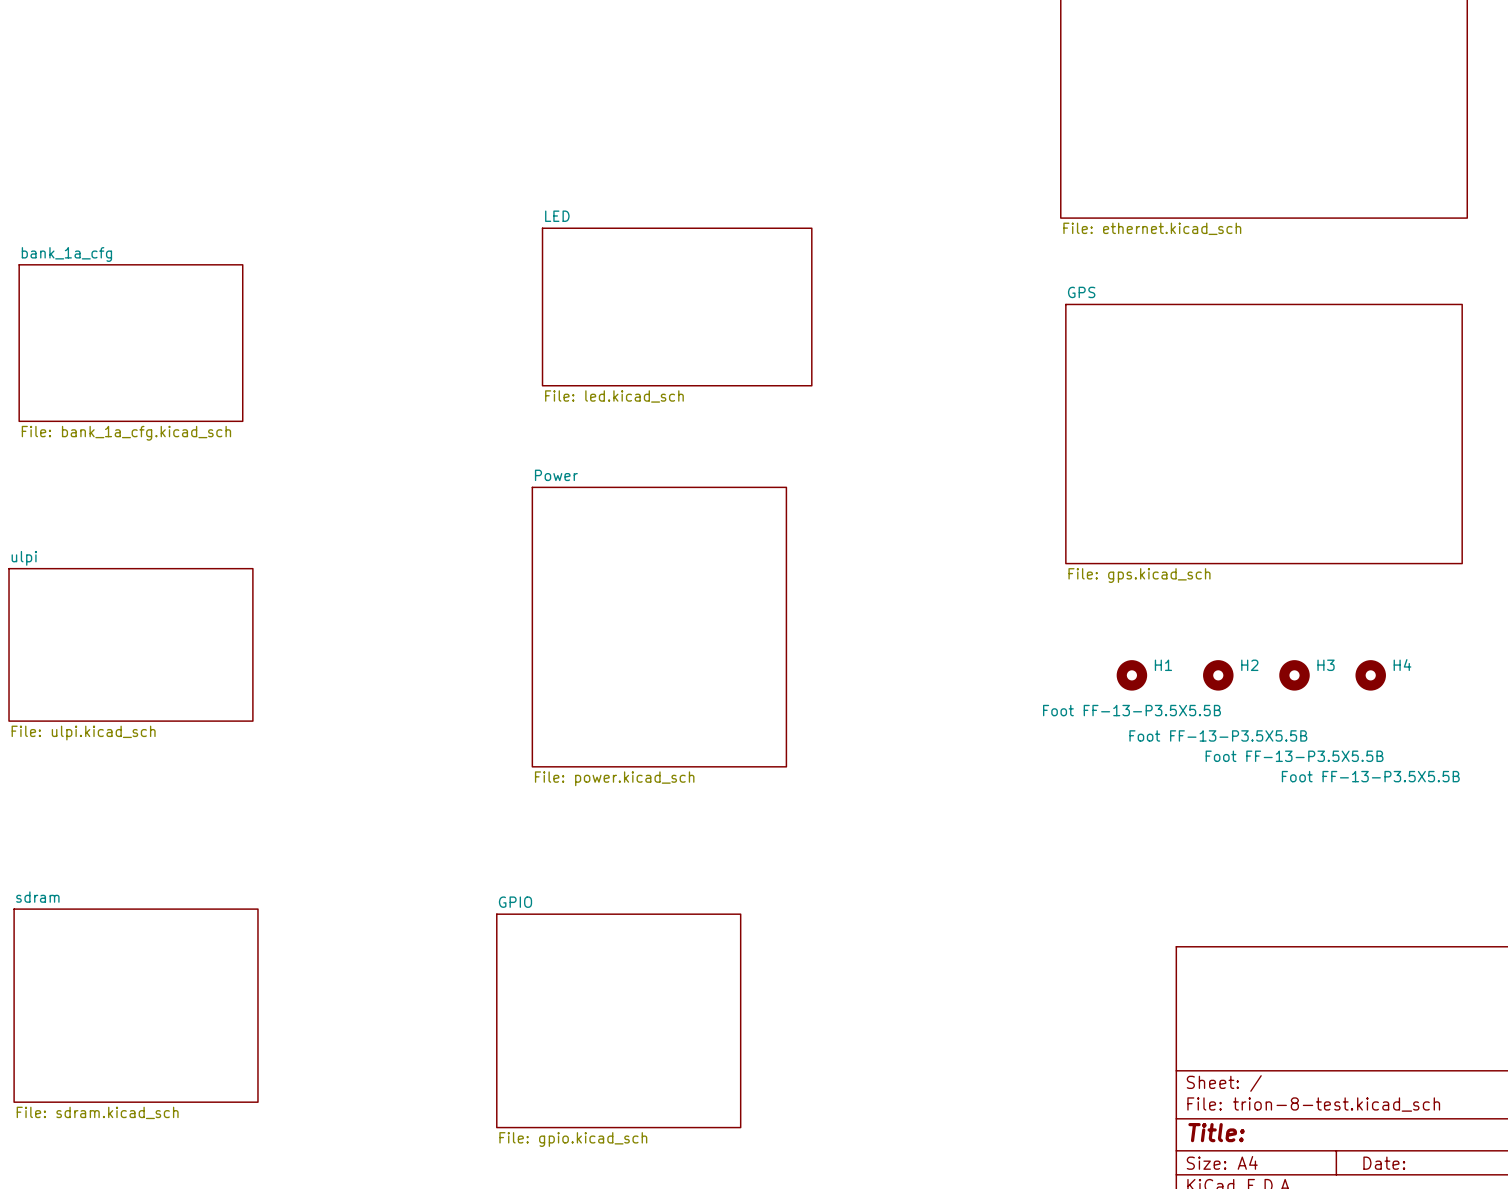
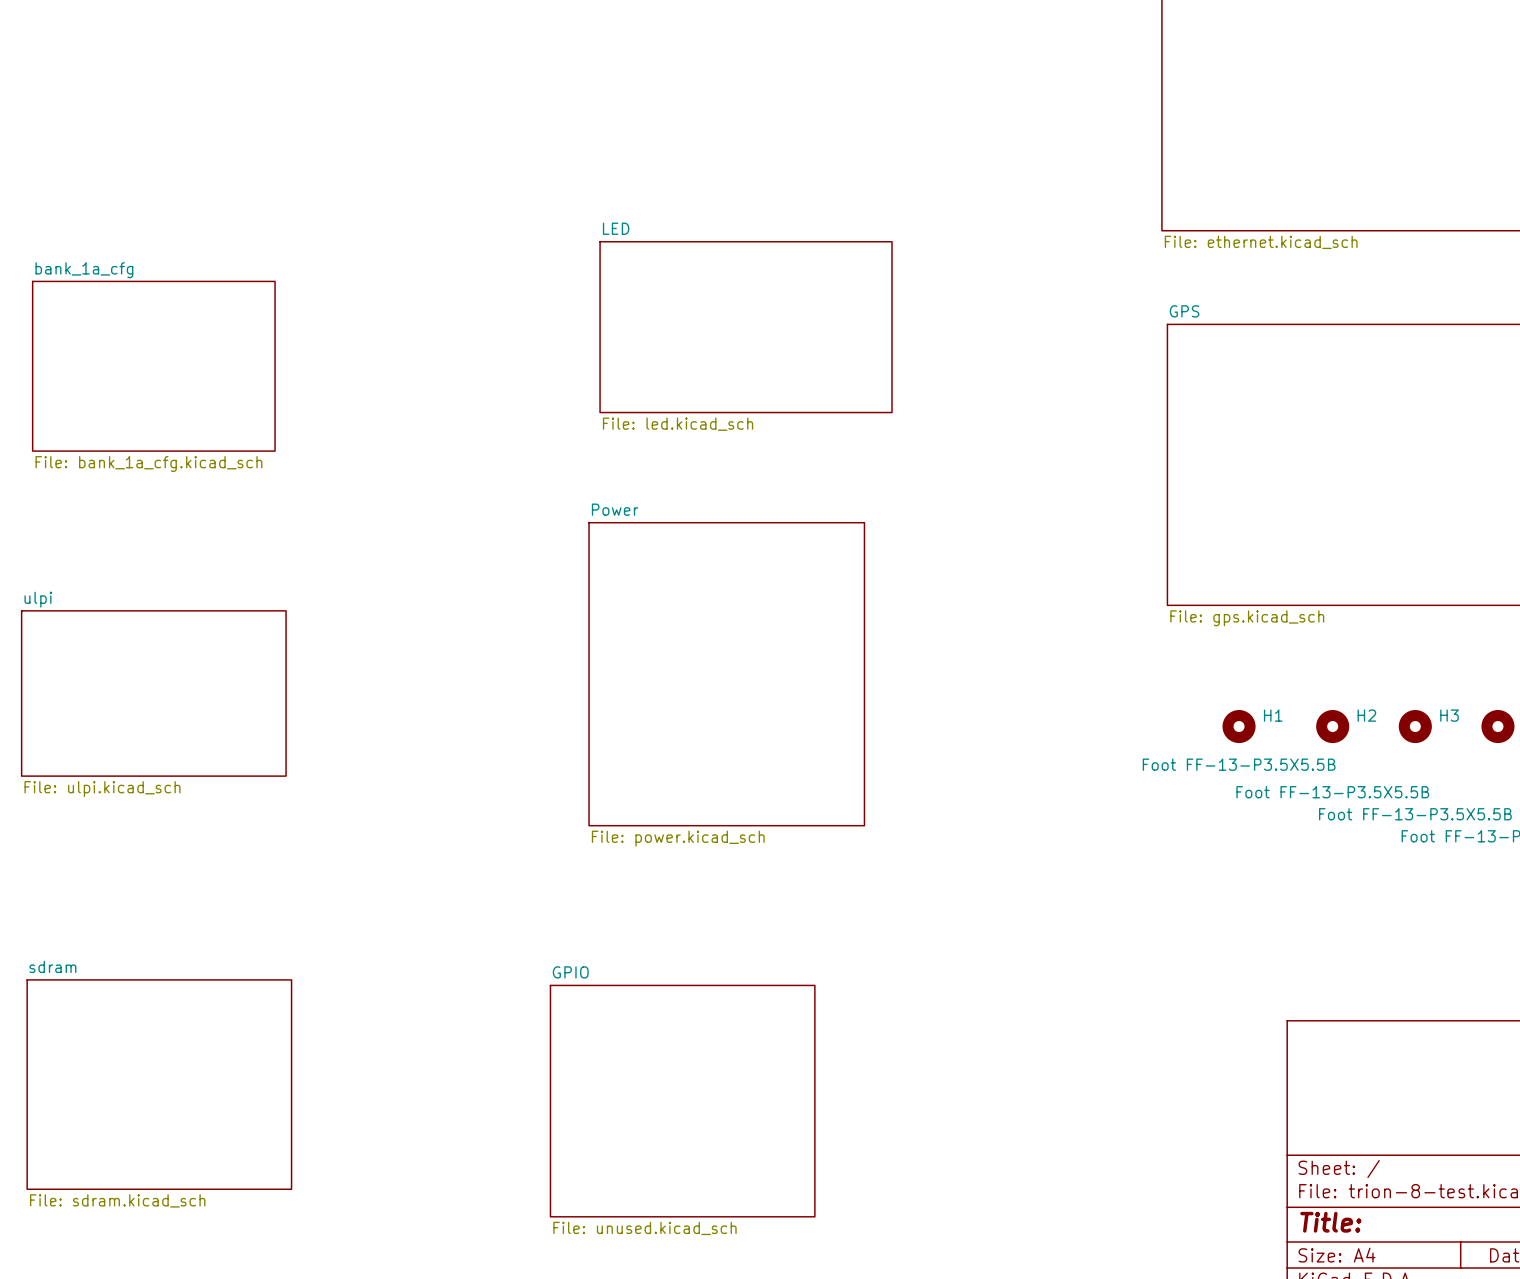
sheet GPIO value: File: gpio.kicad_sch (573, 1139) -> File: unused.kicad_sch (644, 1228)

